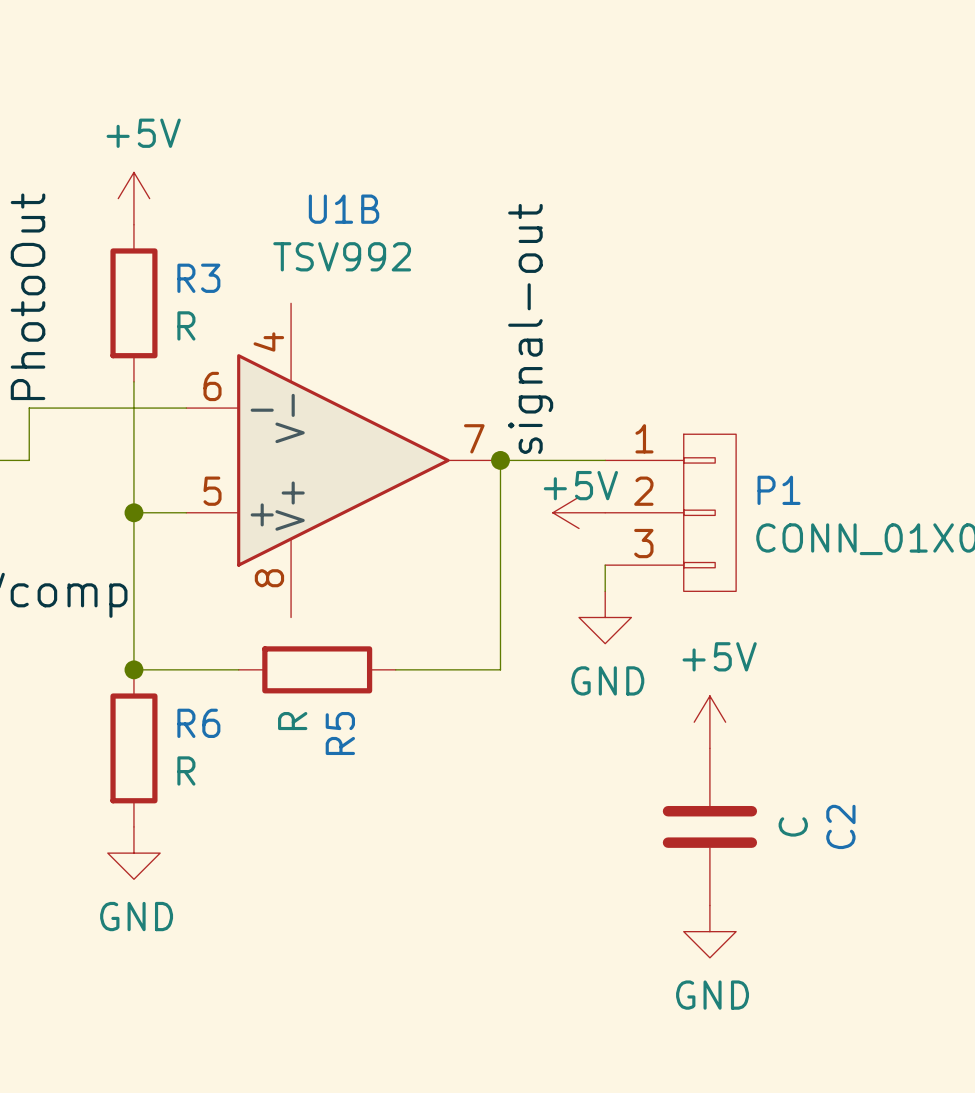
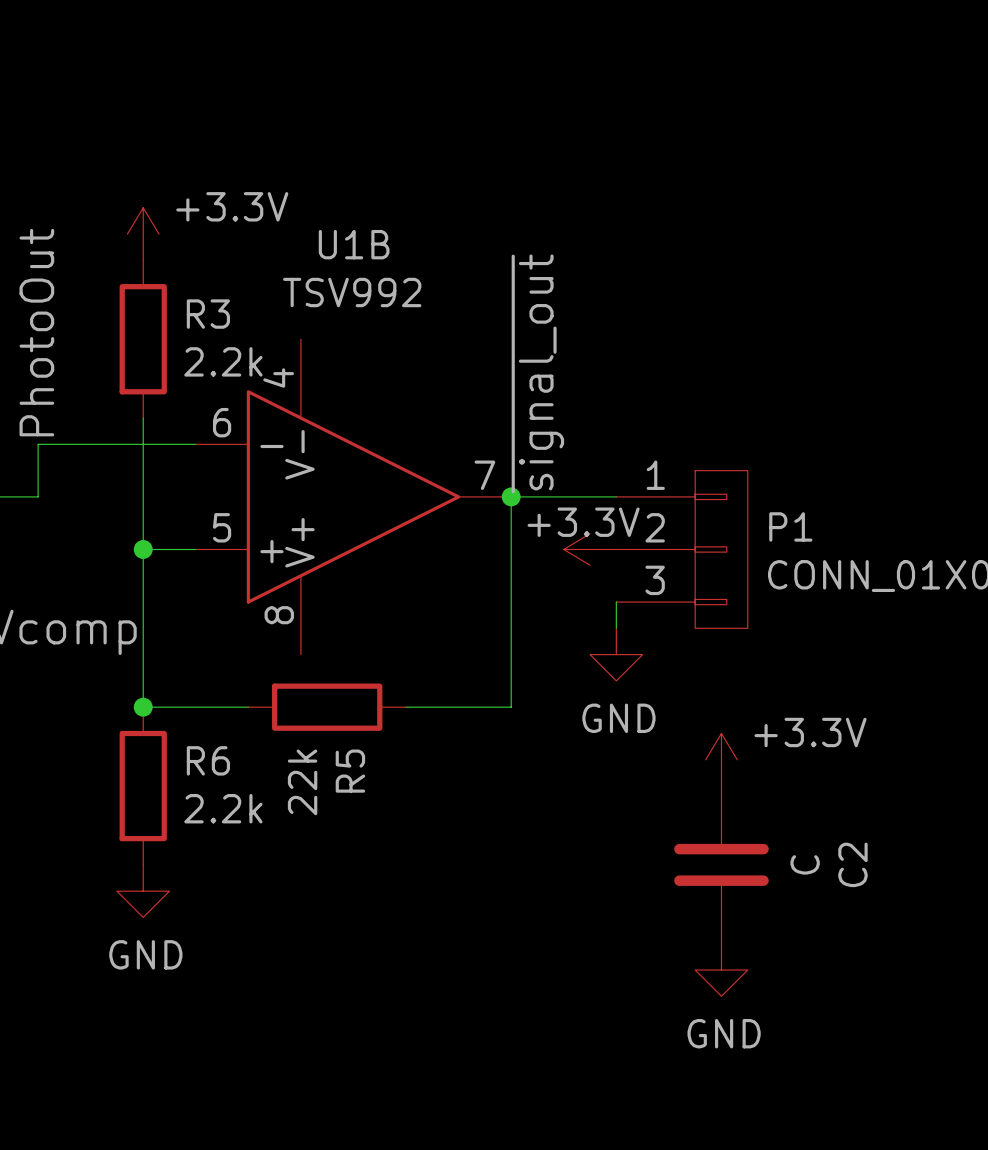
power symbol: +5V (133, 198) -> +3.3V (143, 234)
R3 value: R (186, 325) -> 2.2k (223, 361)
label: signal-out (530, 328) -> ~{signal_out} (537, 373)
power symbol: +5V (579, 512) -> +3.3V (590, 549)
R5 value: R (292, 721) -> 22k (302, 782)
power symbol: +5V (709, 722) -> +3.3V (721, 759)
R6 value: R (186, 770) -> 2.2k (223, 808)

